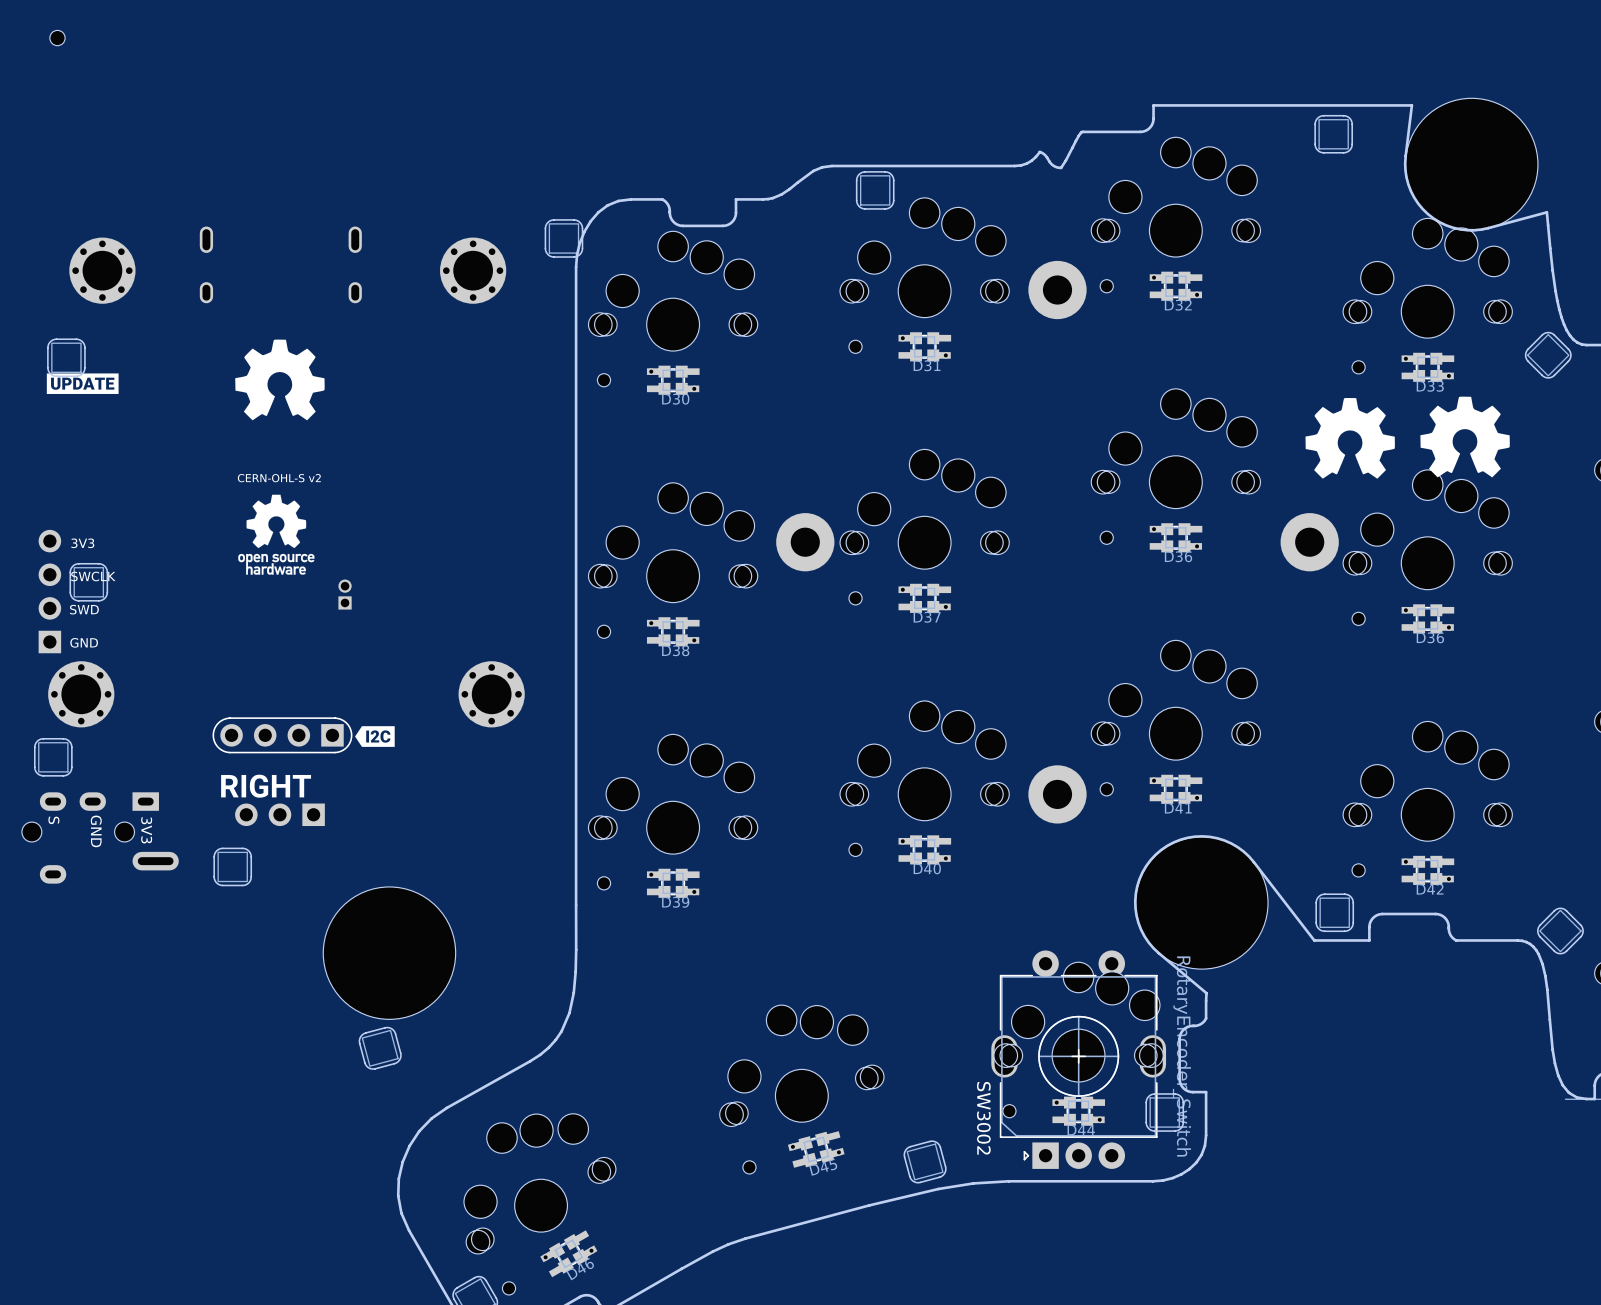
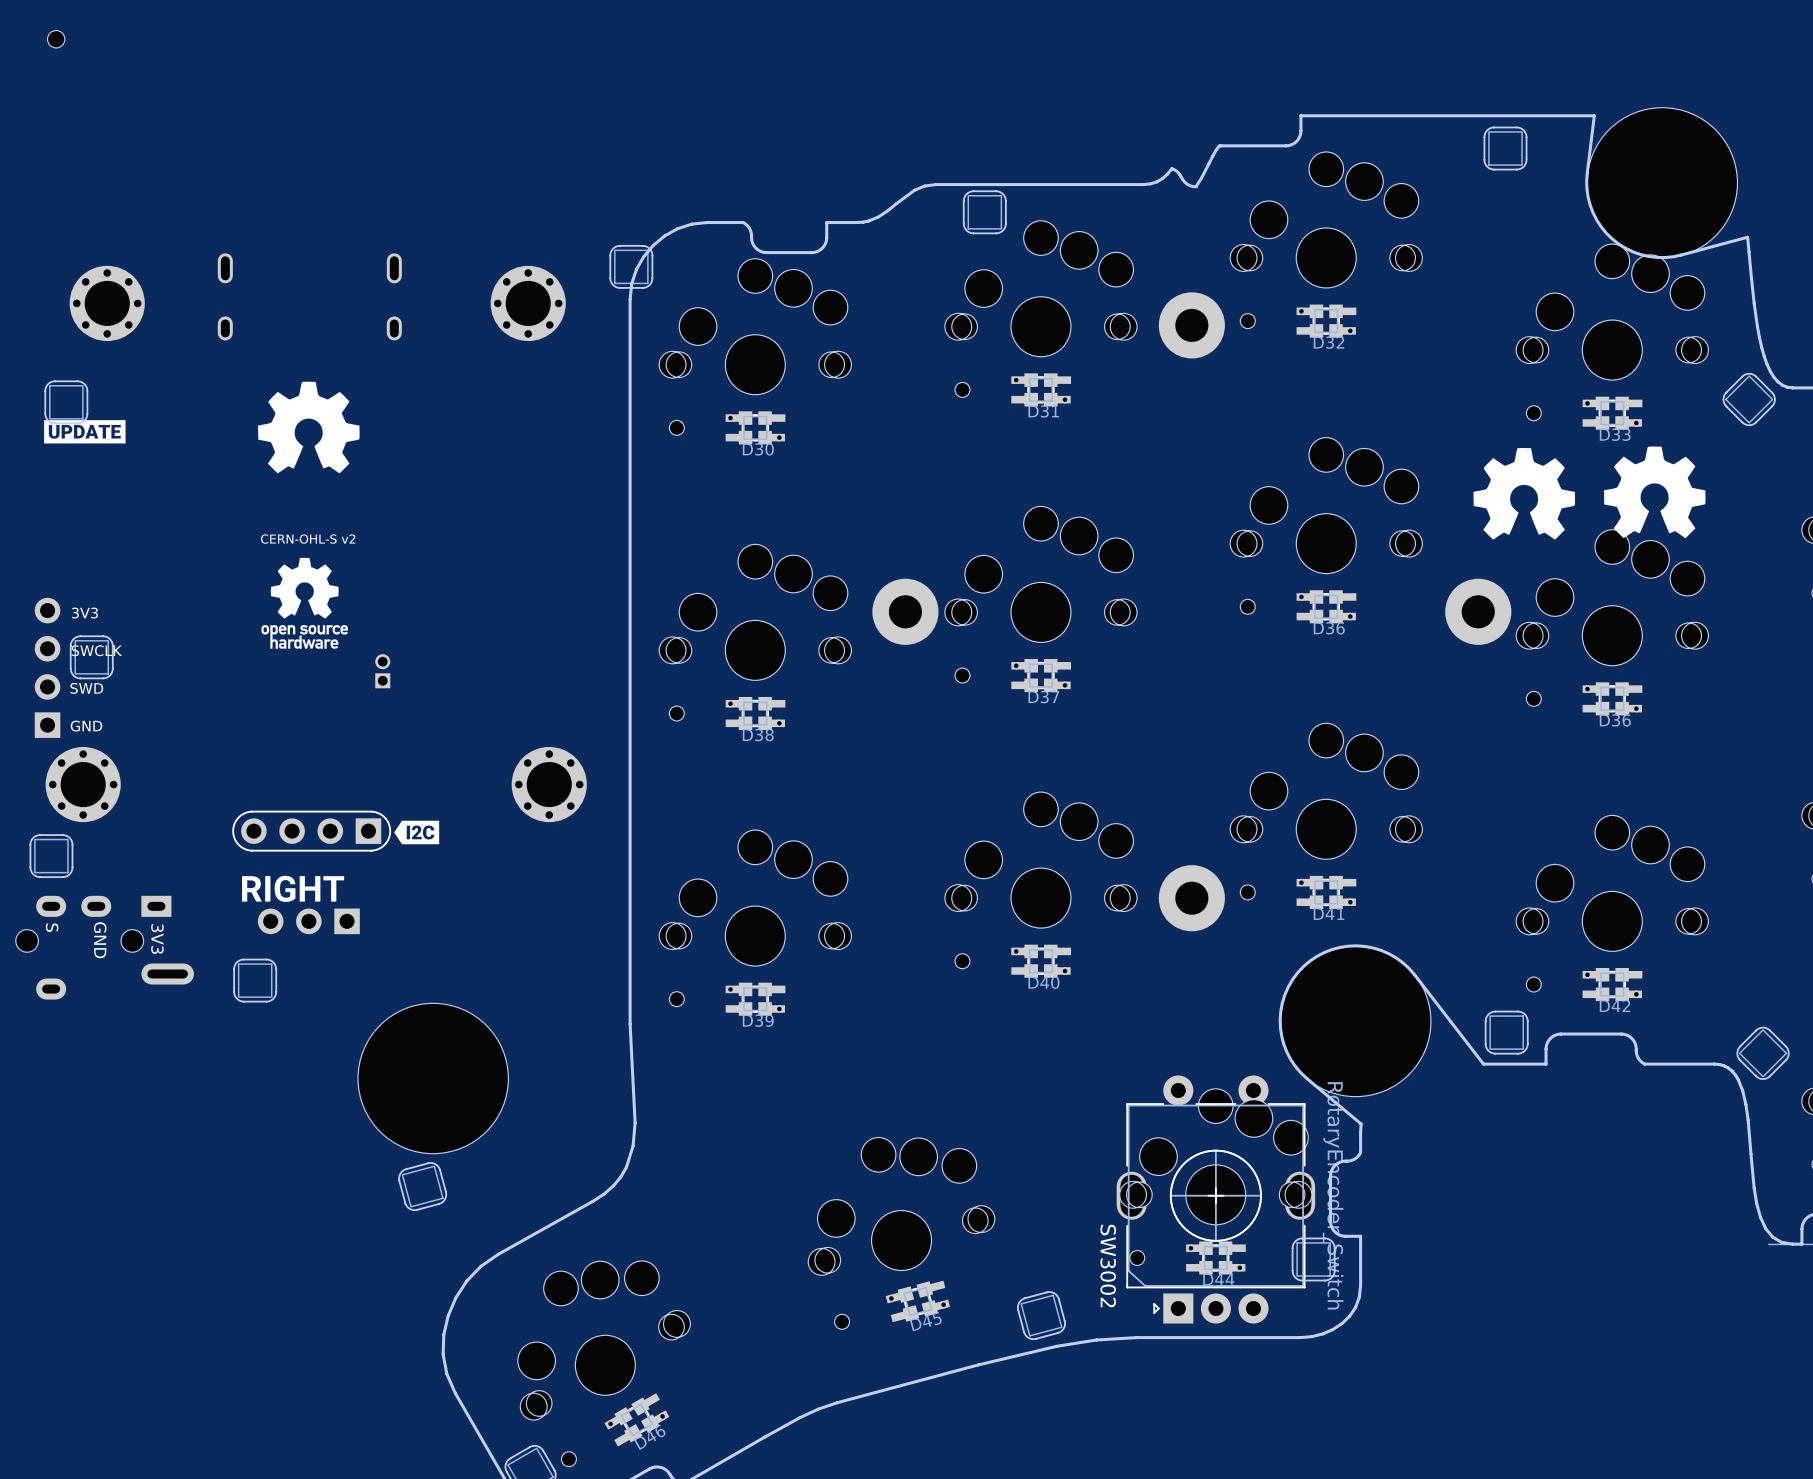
board edge: (630, 199) (618, 200) (598, 212) (584, 231) (577, 254) (575, 971) (569, 1012) (561, 1031) (548, 1047) (530, 1061) -> (707, 222) (691, 224) (664, 236) (643, 256) (636, 269) (631, 283) (630, 299) (630, 1024) (635, 1122) (633, 1145) (626, 1167) (613, 1185) (592, 1201)

